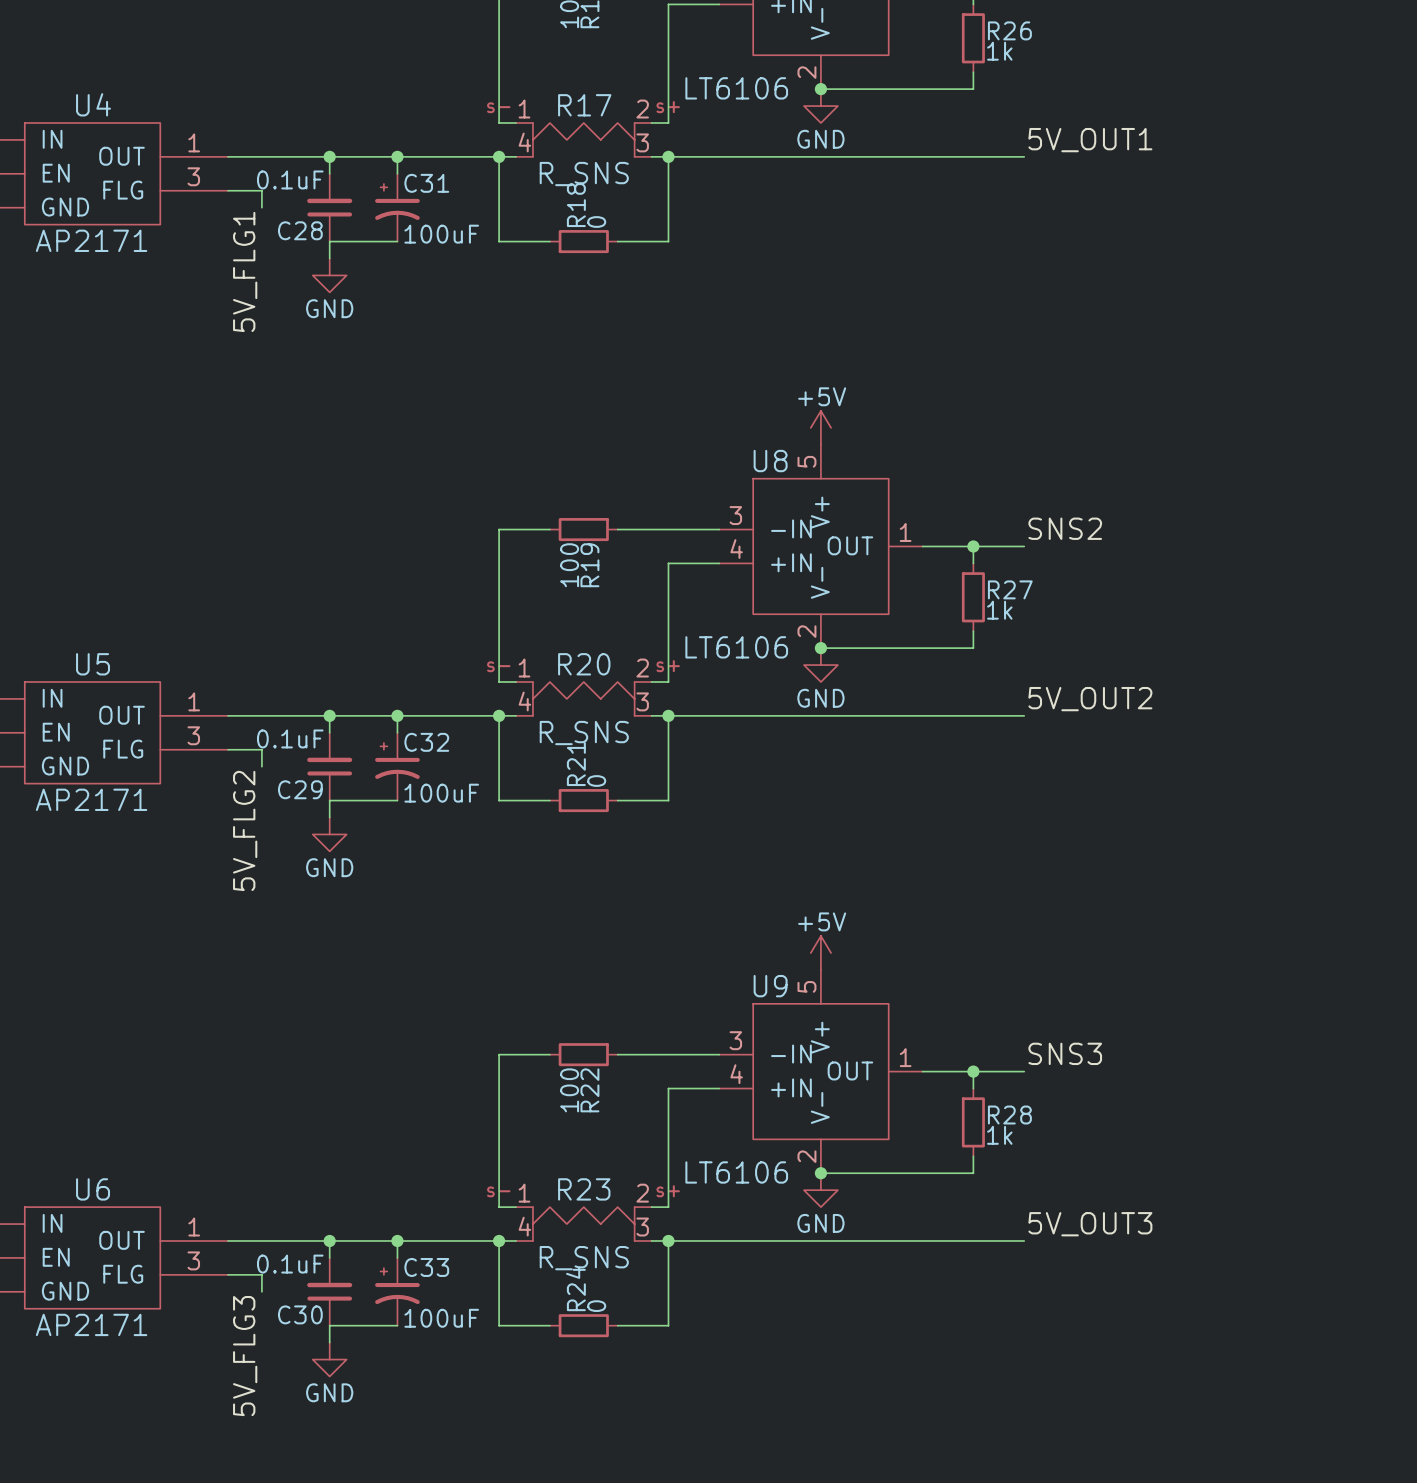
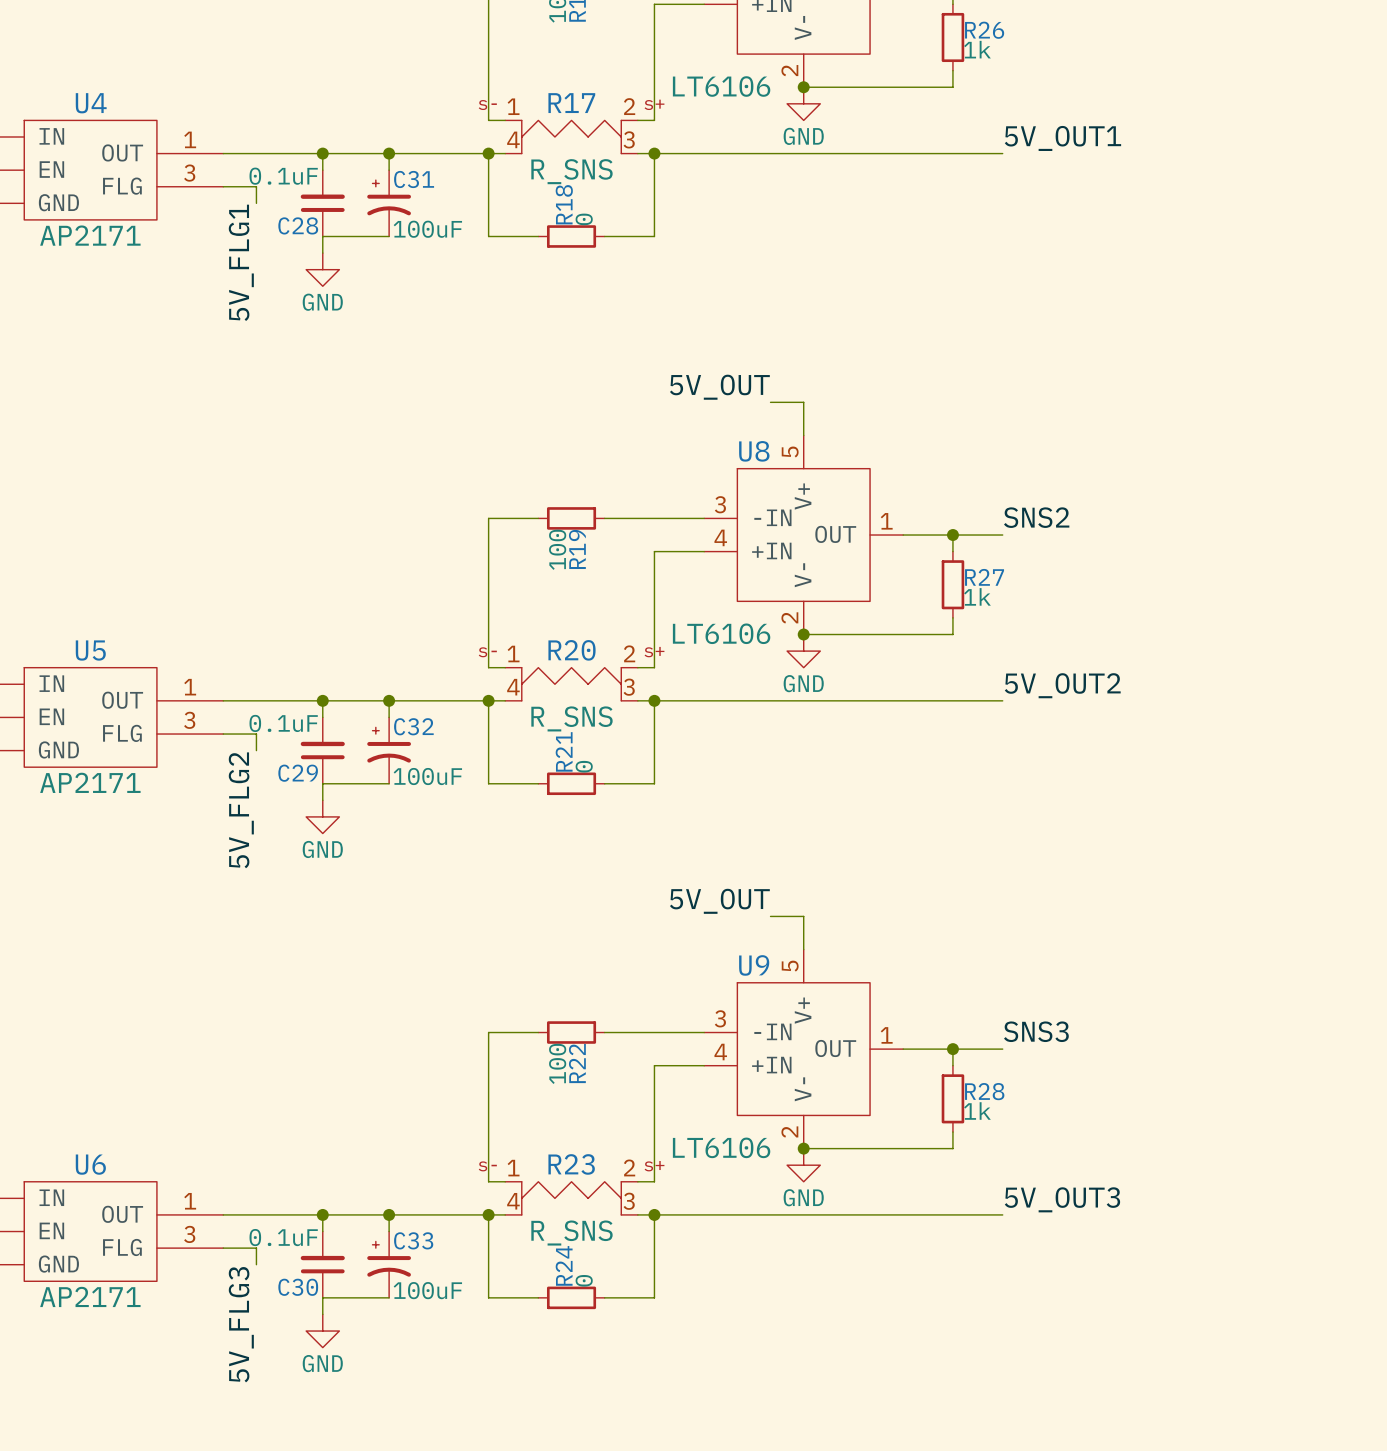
label: none -> 5V_OUT (719, 387)
wire: none -> (770, 402) (803, 402) (803, 435)
power symbol: +5V (820, 427) -> none
label: none -> 5V_OUT (719, 901)
wire: none -> (770, 916) (803, 916) (803, 949)
power symbol: +5V (820, 953) -> none

